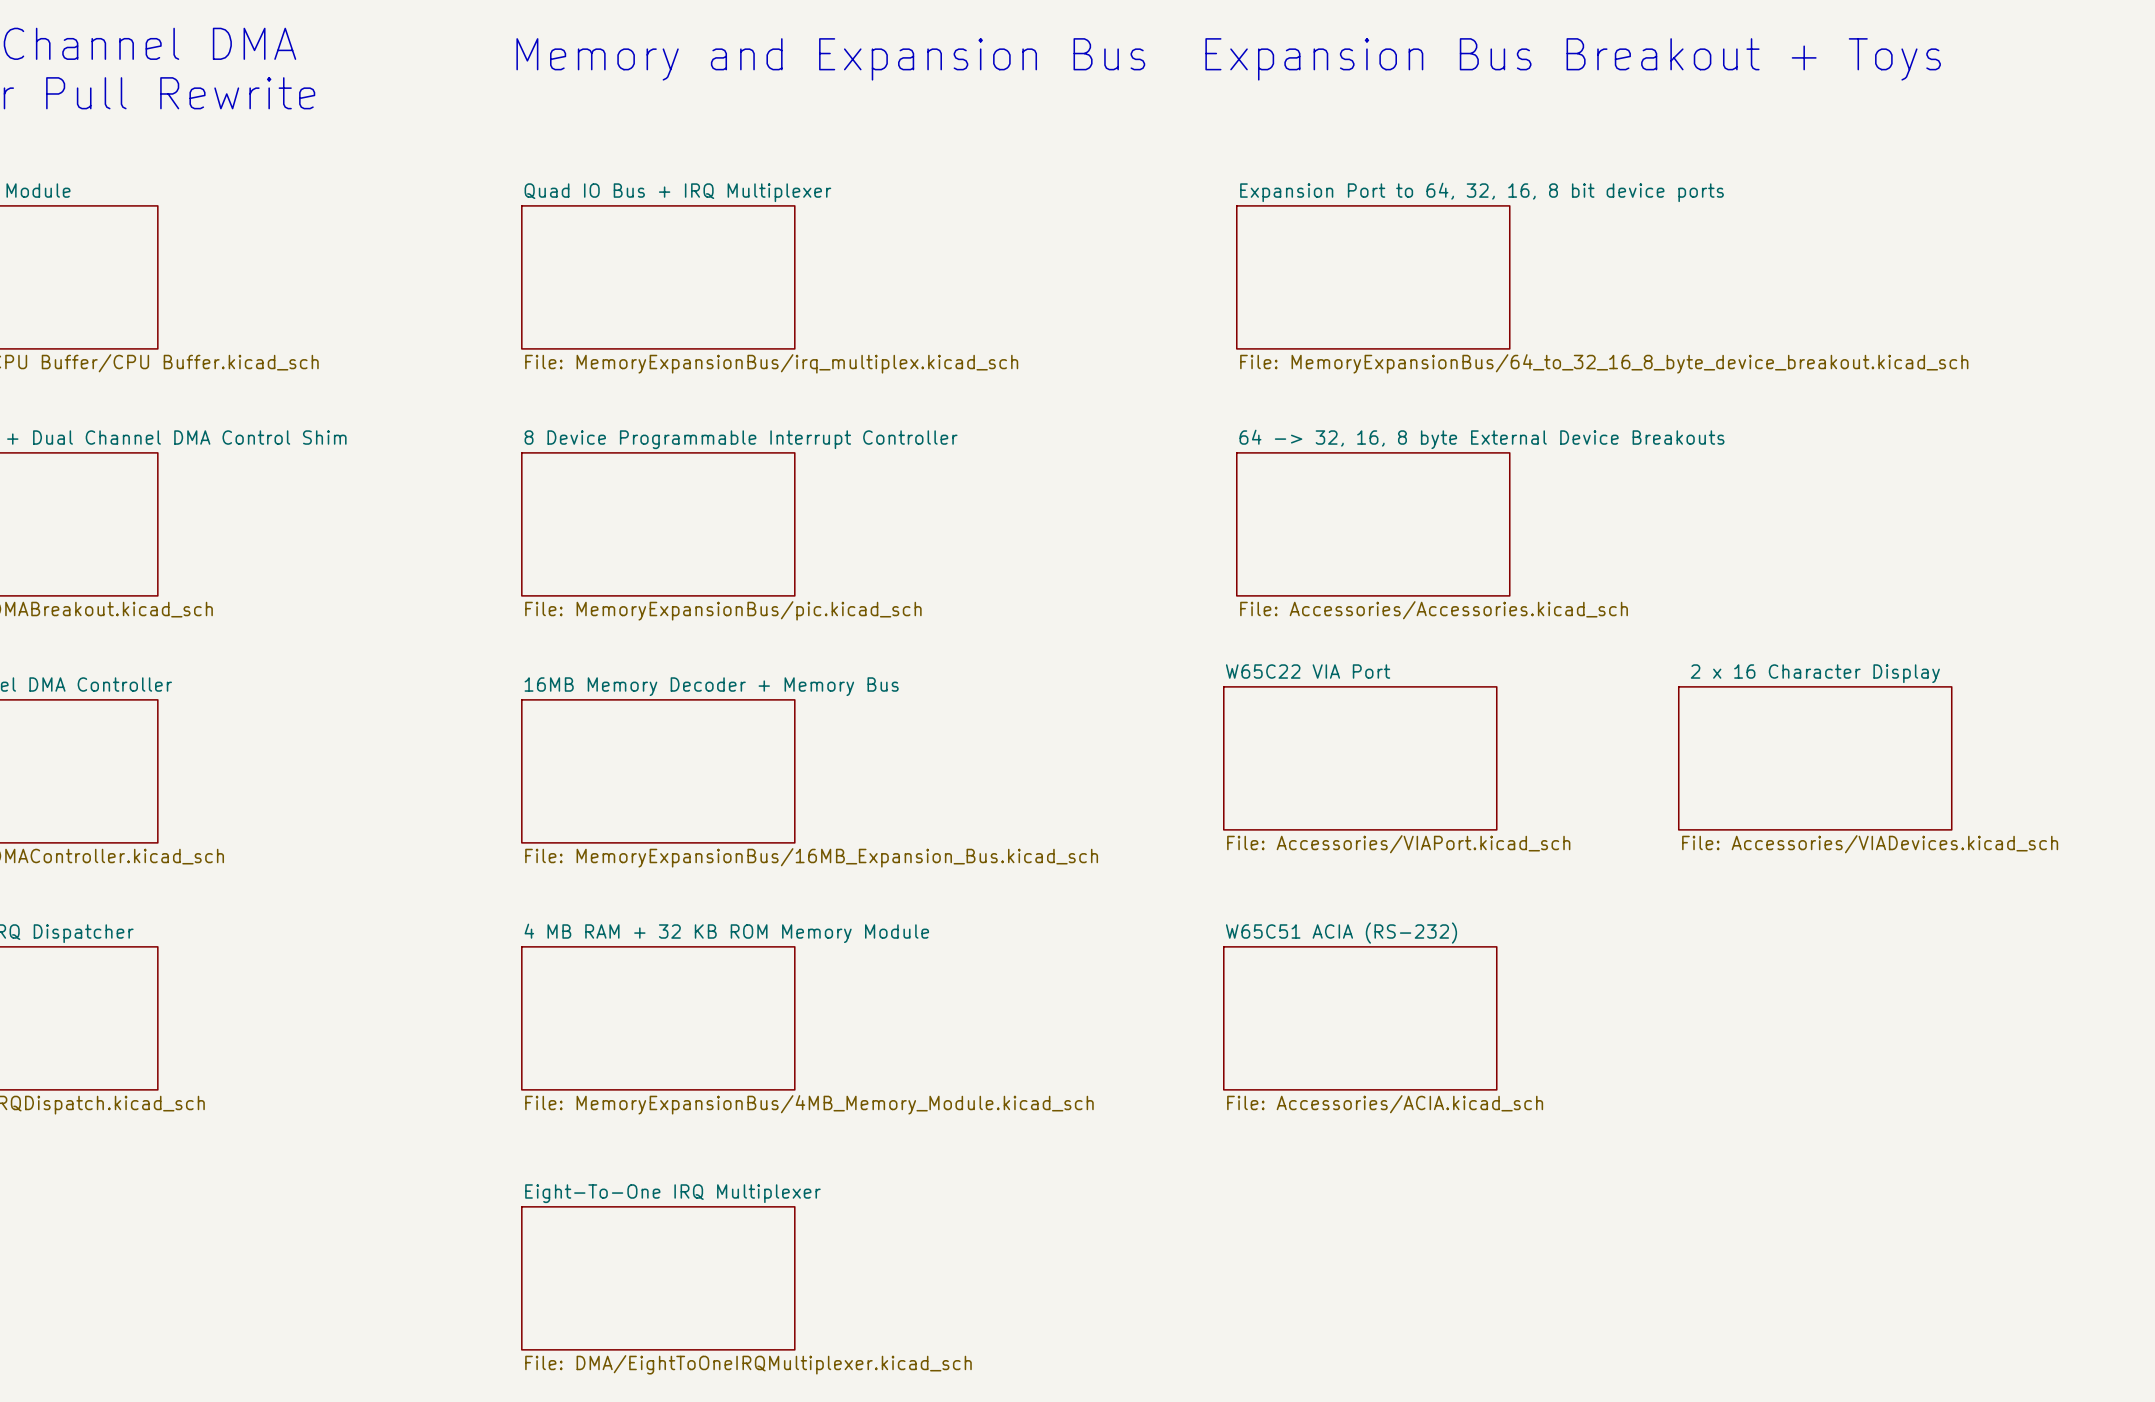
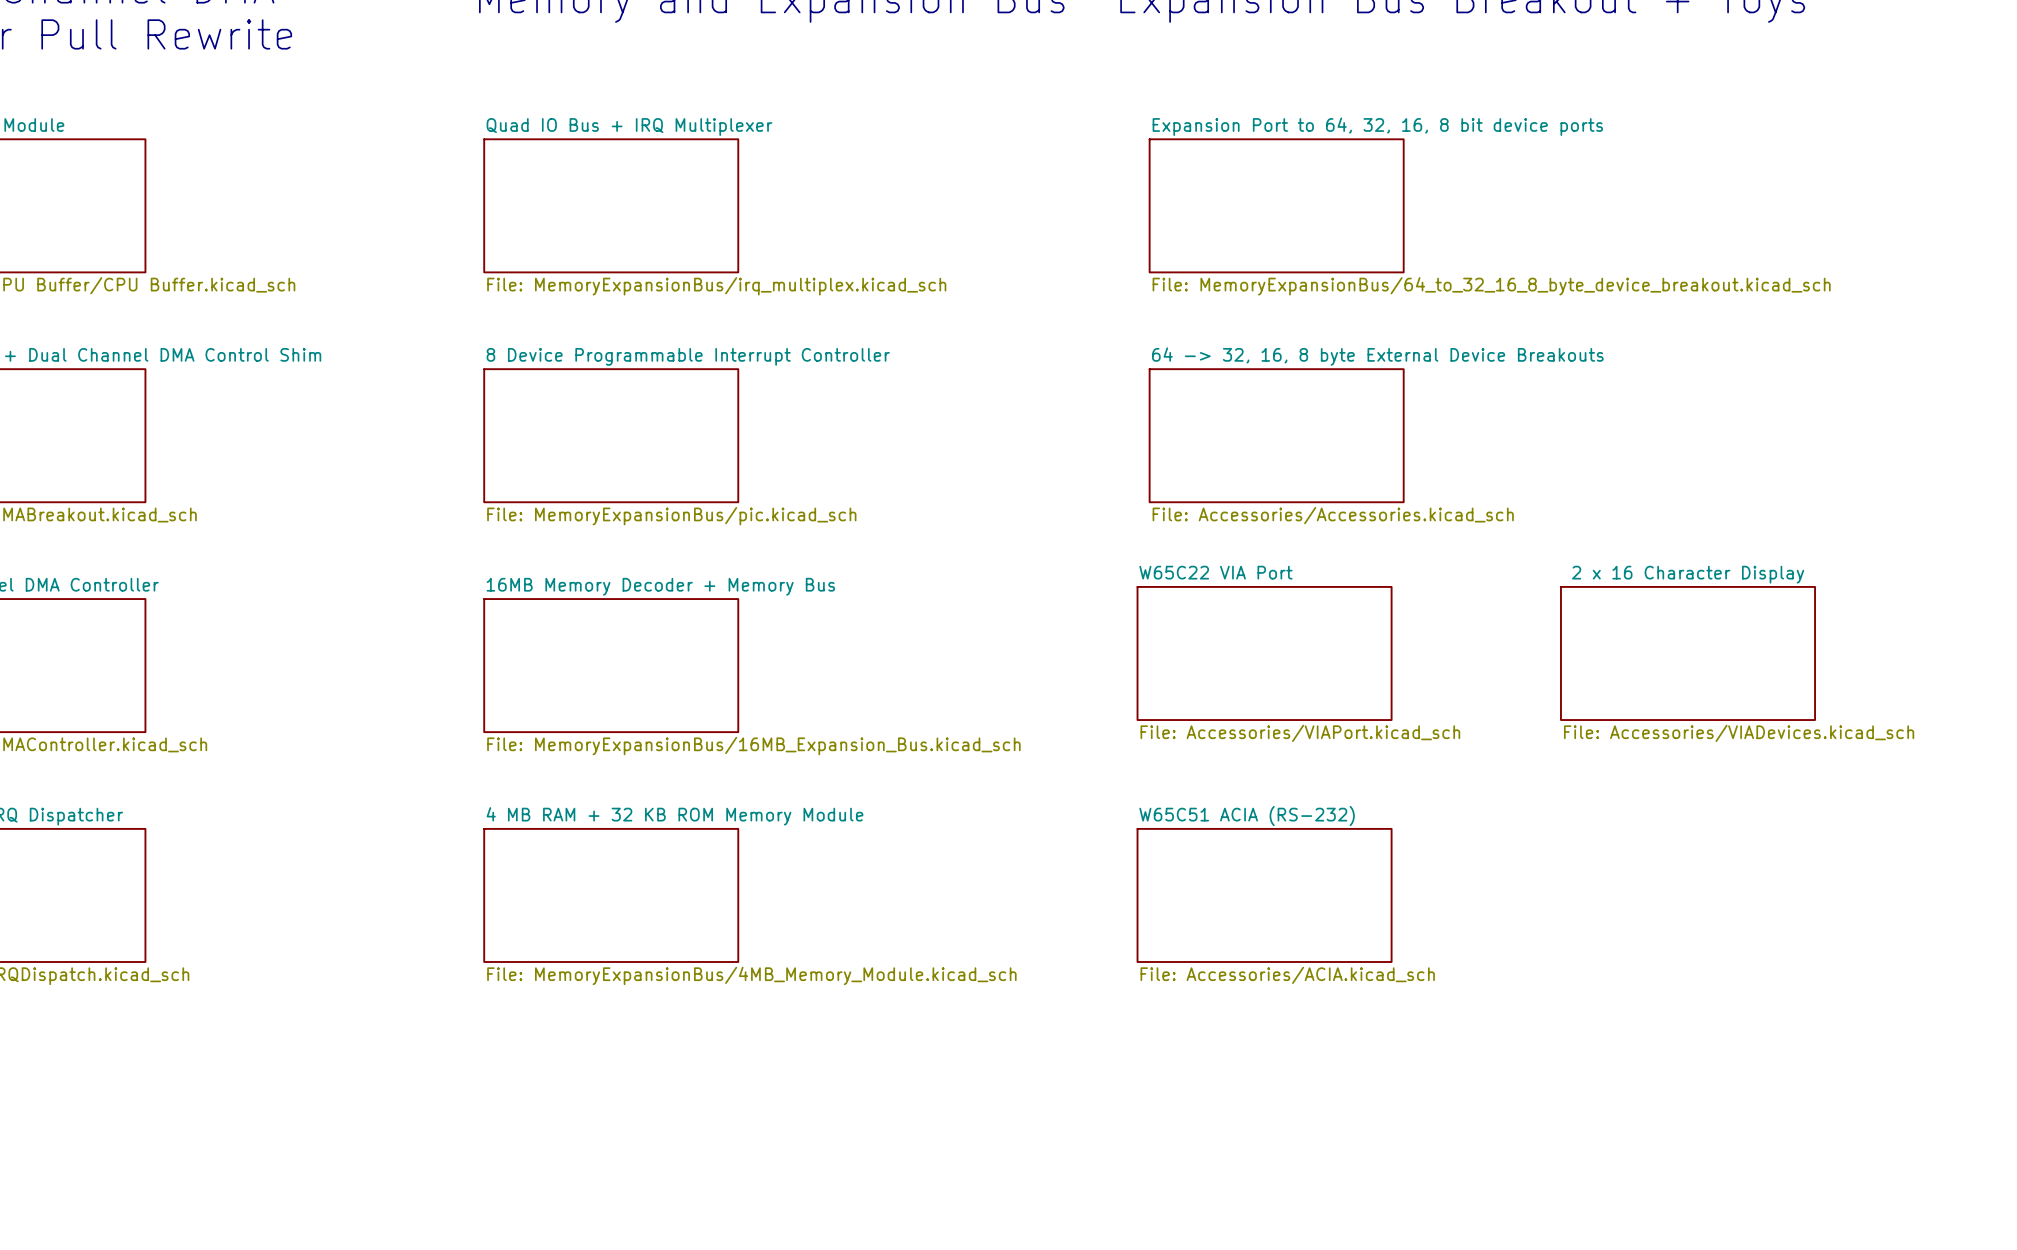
sheet Eight-To-One IRQ Multiplexer: File: DMA/EightToOneIRQMultiplexer.kicad_sch (658, 1278) -> none

